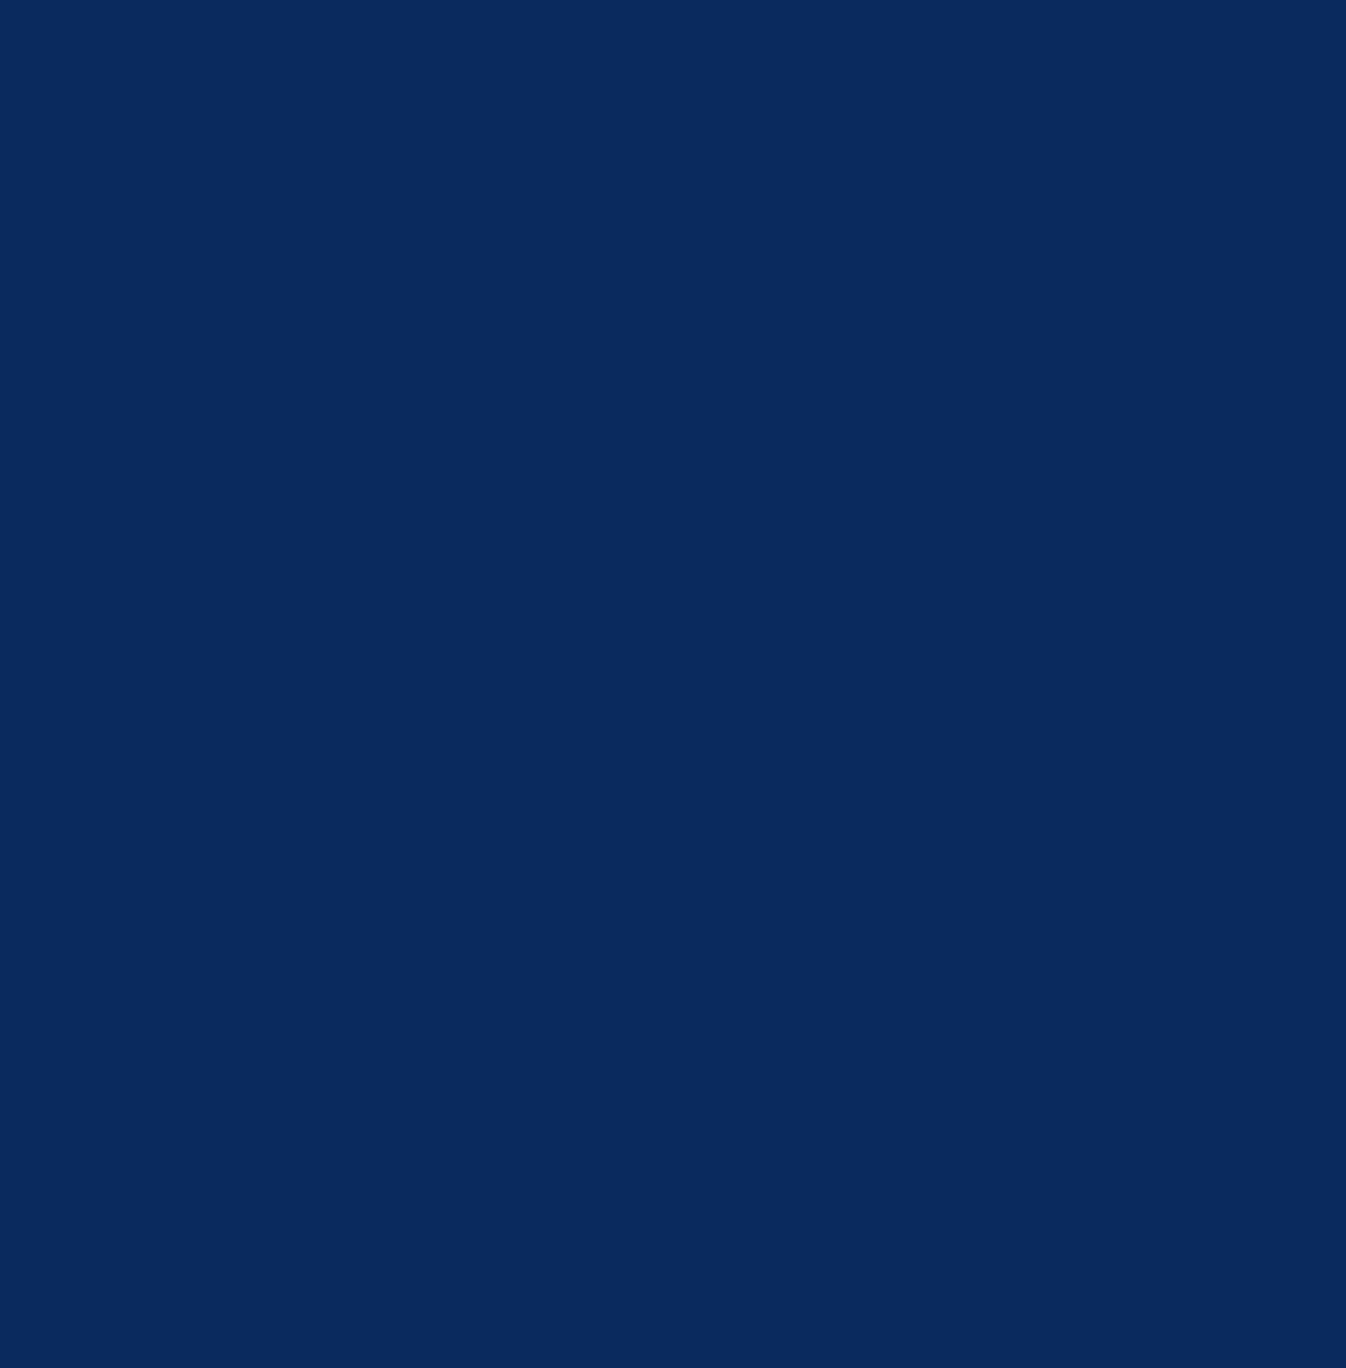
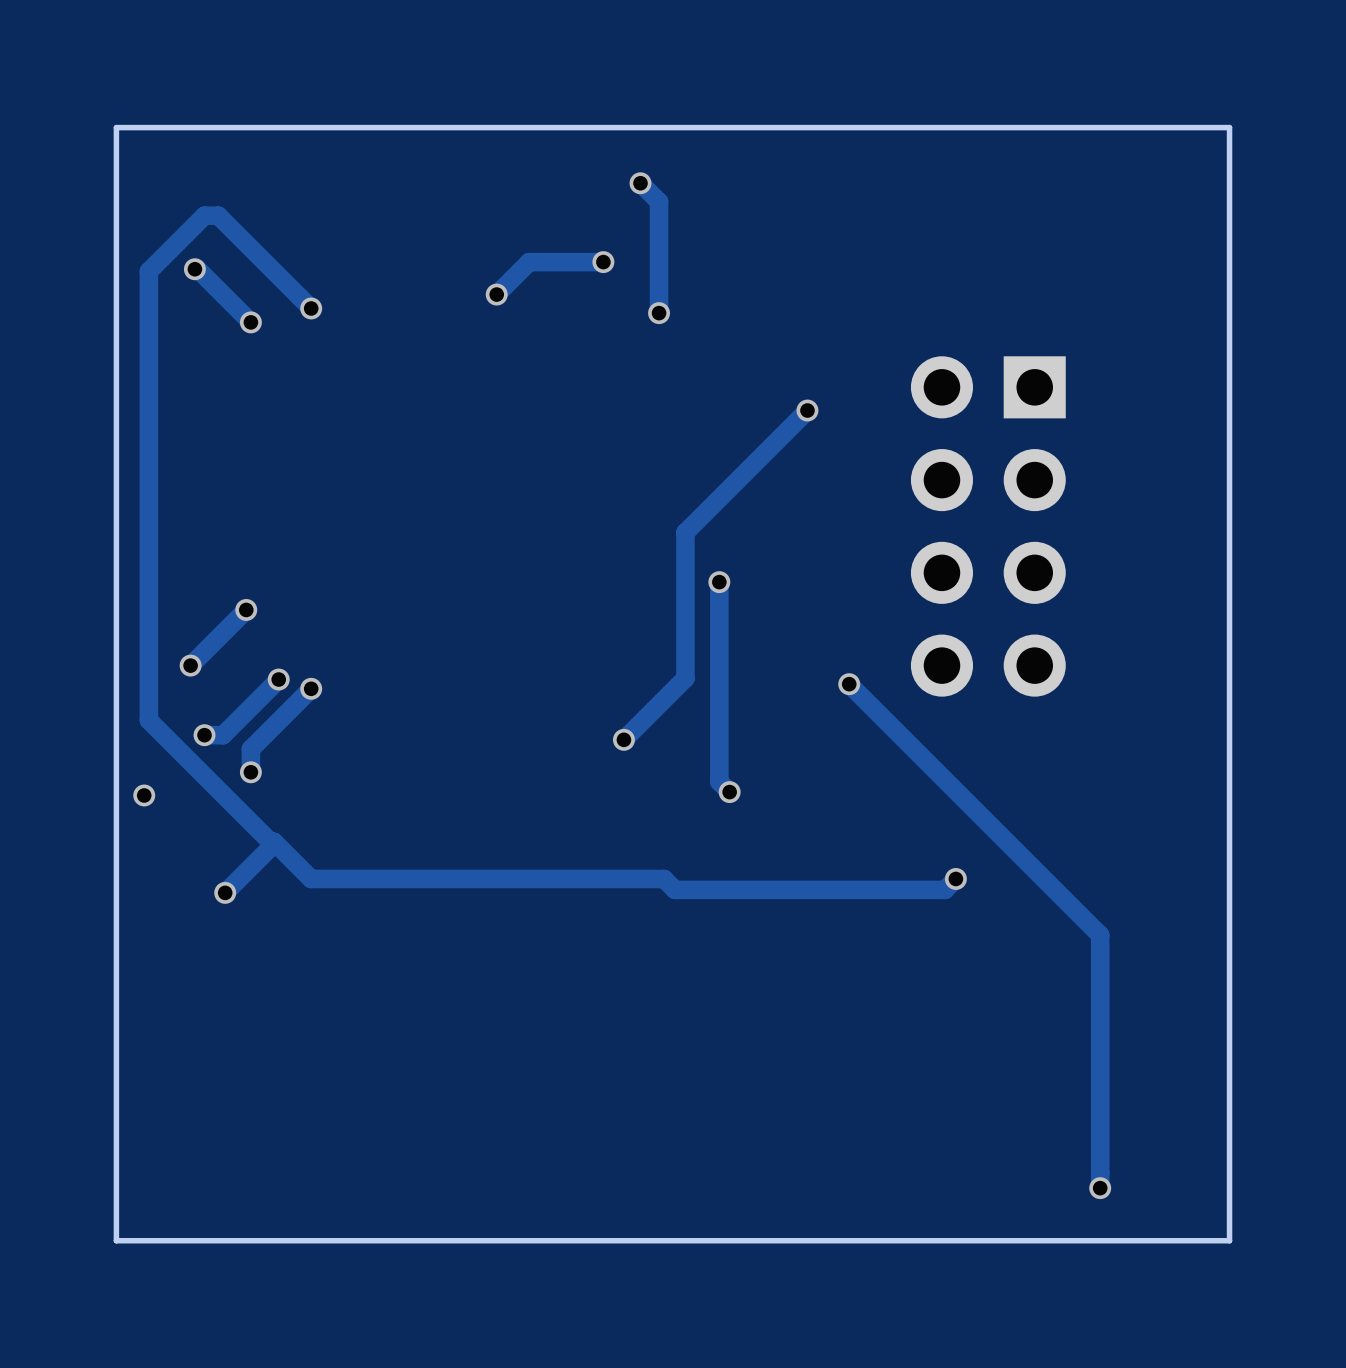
board edge: none -> (1229, 127) (116, 127) (116, 1240) (1229, 1240) (1229, 127)
track: none -> (640, 183) (659, 201) (659, 313)
via: none -> (640, 183)
track: none -> (603, 262) (529, 262) (496, 294)
via: none -> (603, 262)
track: none -> (194, 269) (197, 269) (250, 322)
via: none -> (194, 269)
via: none -> (496, 294)
track: none -> (311, 308) (218, 215) (204, 215) (148, 271) (148, 720) (270, 841) (274, 841)
via: none -> (311, 308)
via: none -> (659, 313)
via: none -> (250, 322)
track: none -> (807, 410) (685, 532) (685, 678) (623, 739)
via: none -> (807, 410)
part: none -> (988, 526)
track: none -> (719, 582) (719, 781) (729, 792)
via: none -> (719, 582)
track: none -> (246, 609) (190, 665)
via: none -> (246, 609)
via: none -> (190, 665)
track: none -> (278, 679) (223, 735) (204, 735)
via: none -> (278, 679)
track: none -> (849, 684) (1100, 935) (1100, 1188)
via: none -> (849, 684)
track: none -> (311, 688) (250, 749) (250, 772)
via: none -> (311, 688)
via: none -> (204, 735)
via: none -> (623, 739)
via: none -> (250, 772)
via: none -> (729, 792)
via: none -> (144, 795)
track: none -> (274, 841) (311, 878) (664, 878) (675, 889) (944, 889) (955, 878)
track: none -> (274, 841) (225, 892)
via: none -> (955, 878)
via: none -> (225, 892)
via: none -> (1100, 1188)

